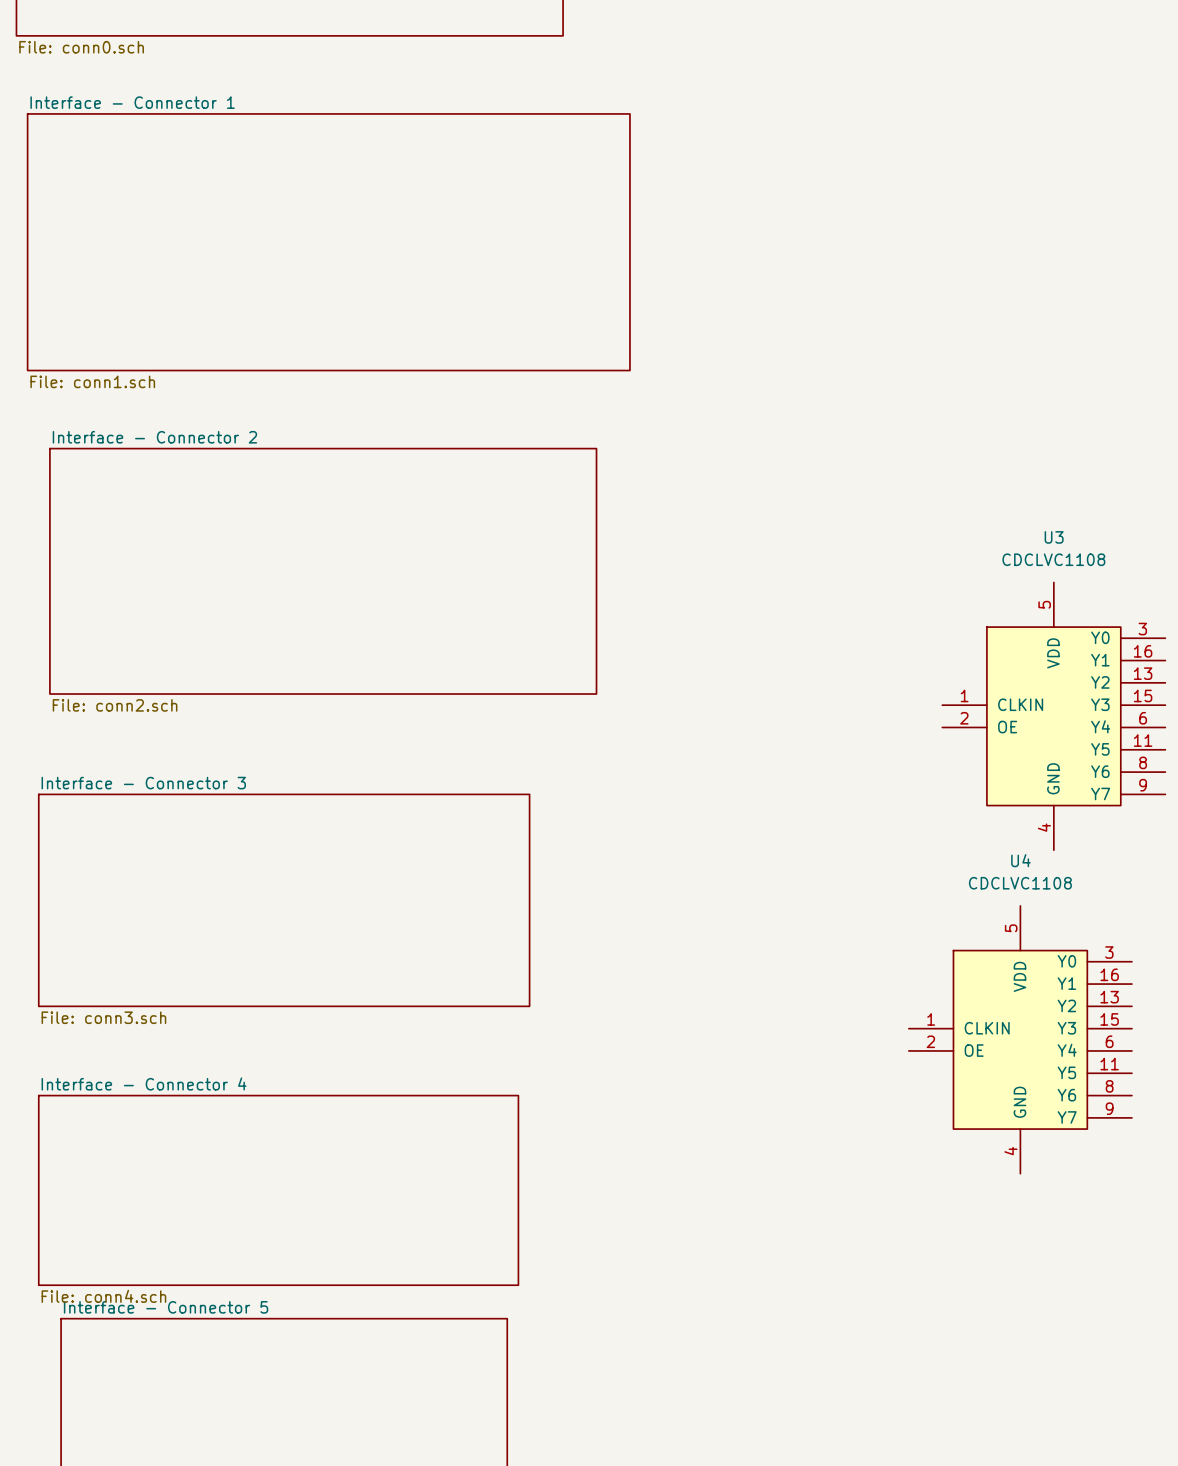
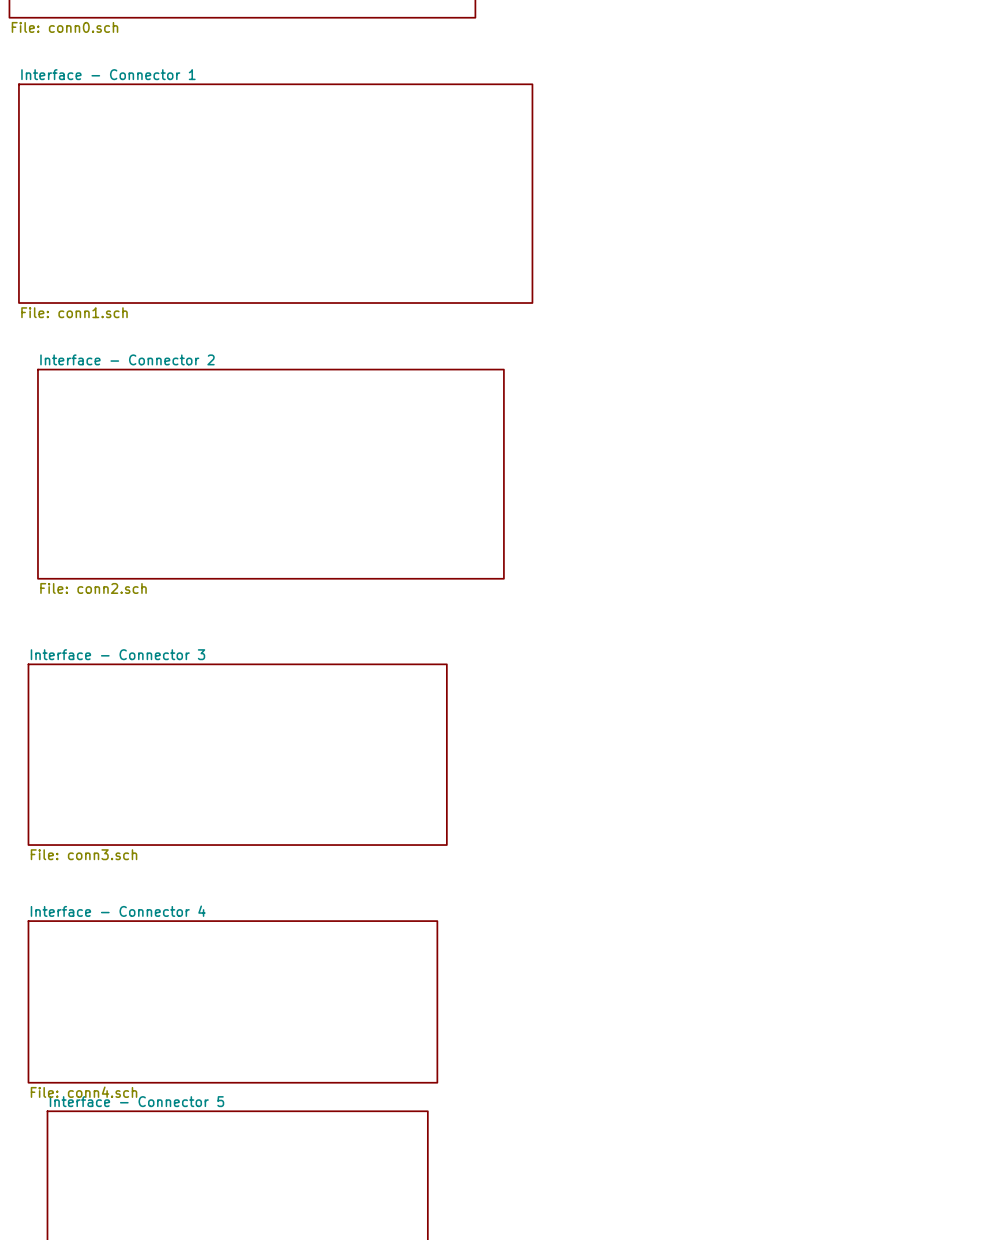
U3: CDCLVC1108 (1053, 716) -> none
U4: CDCLVC1108 (1020, 1039) -> none

